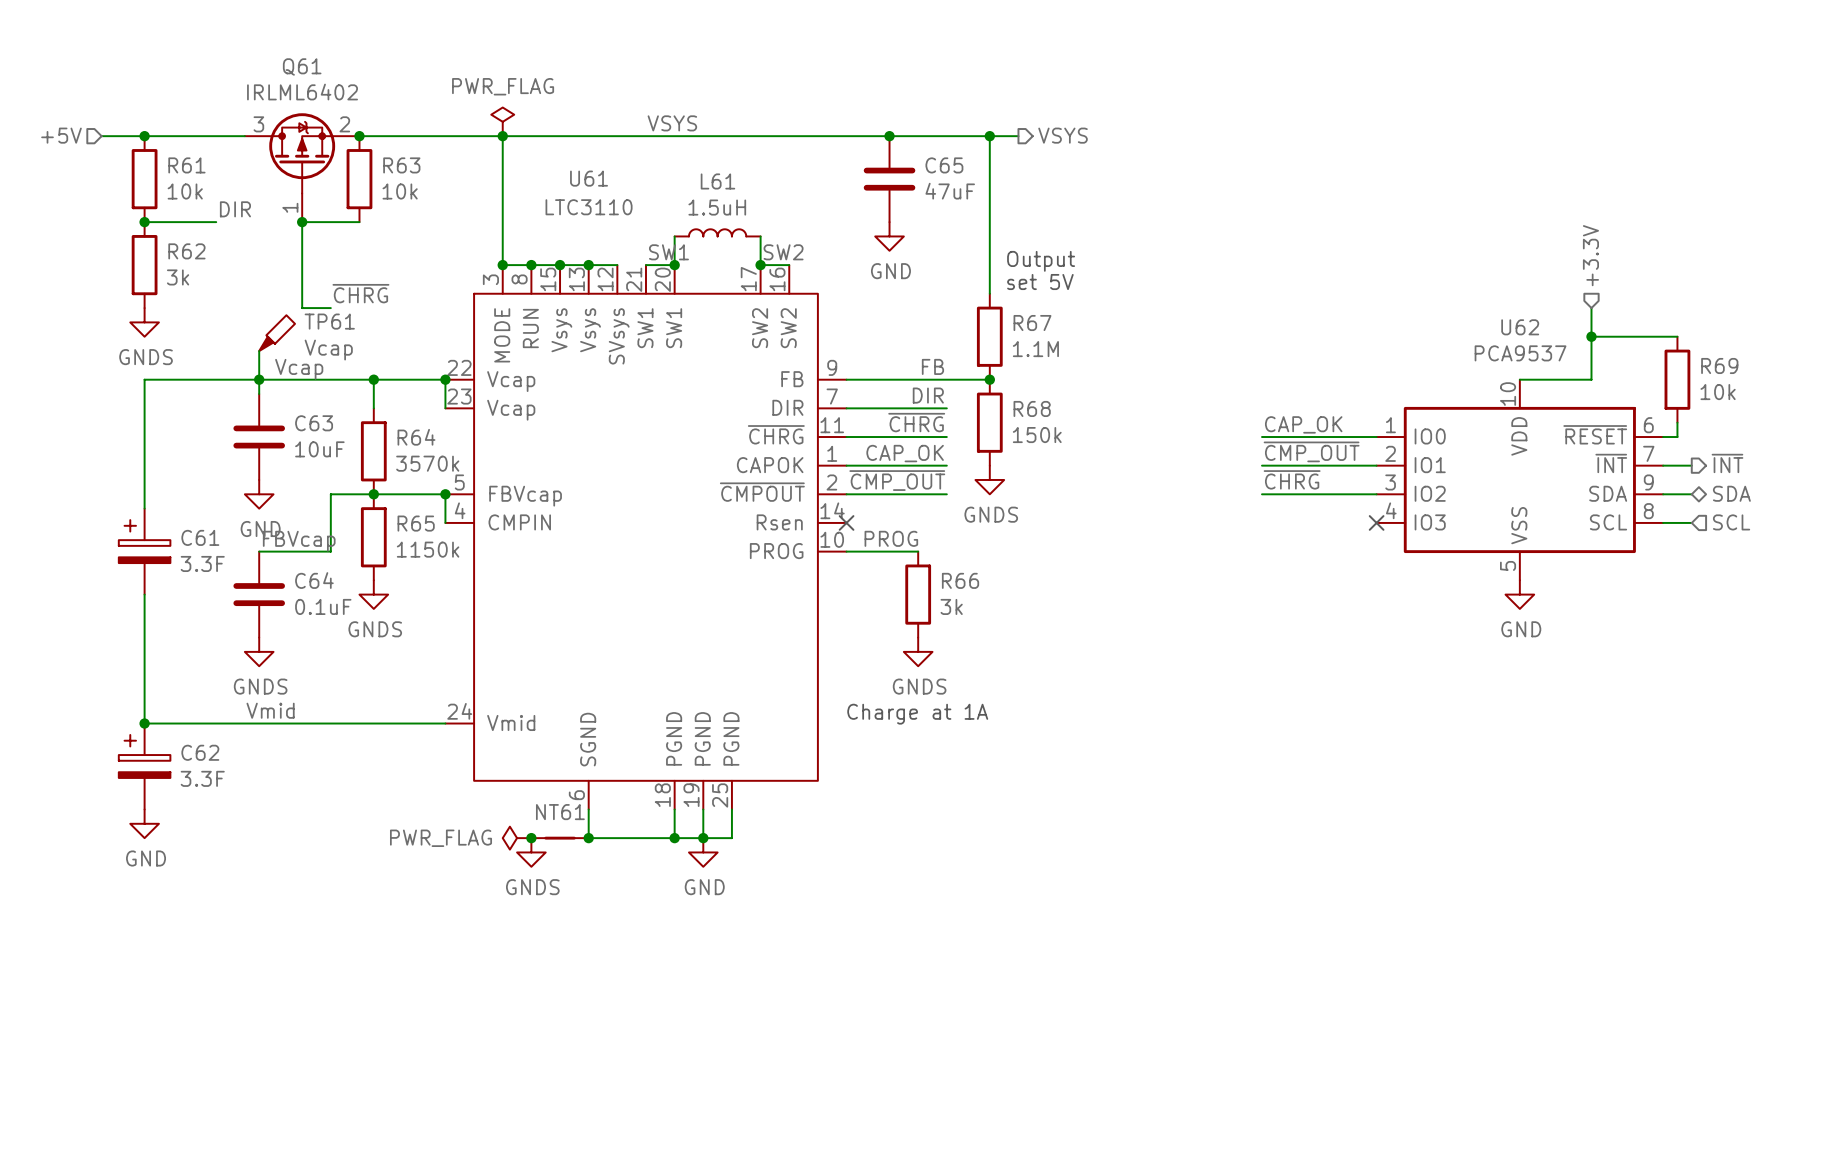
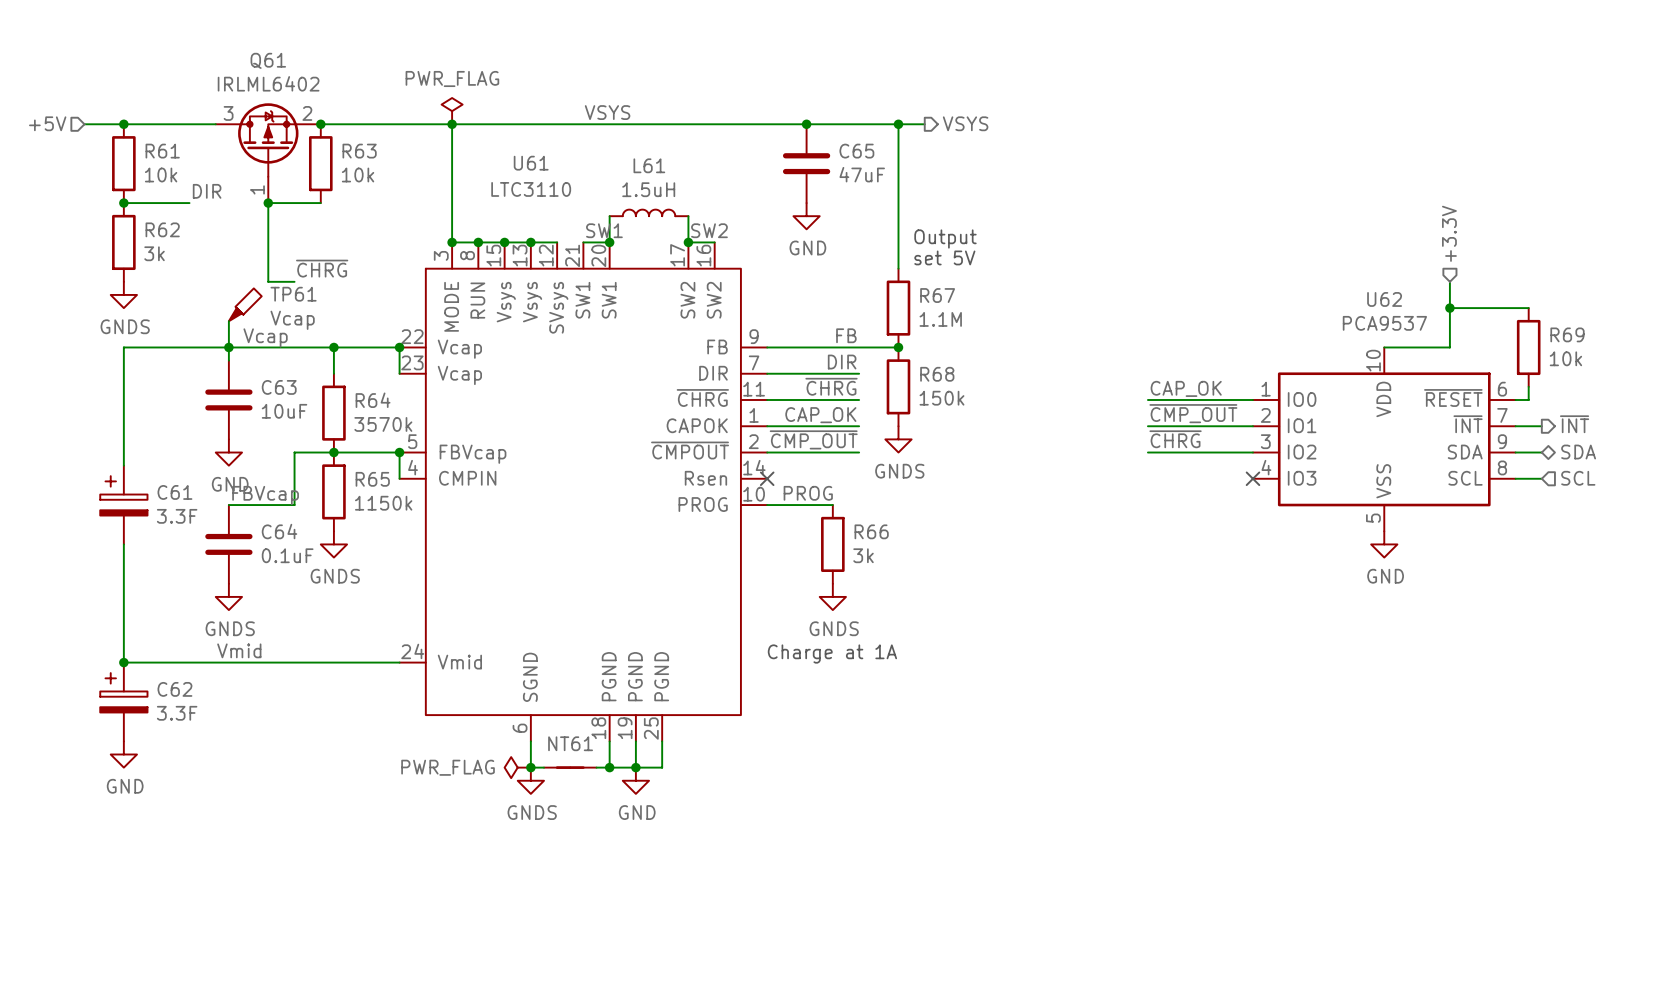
power symbol position: PWR_FLAG (517, 838) -> PWR_FLAG (517, 767)
junction: (531, 838) -> none
NT61 position: (560, 838) -> (570, 767)
power symbol position: GNDS (531, 852) -> GNDS (530, 780)

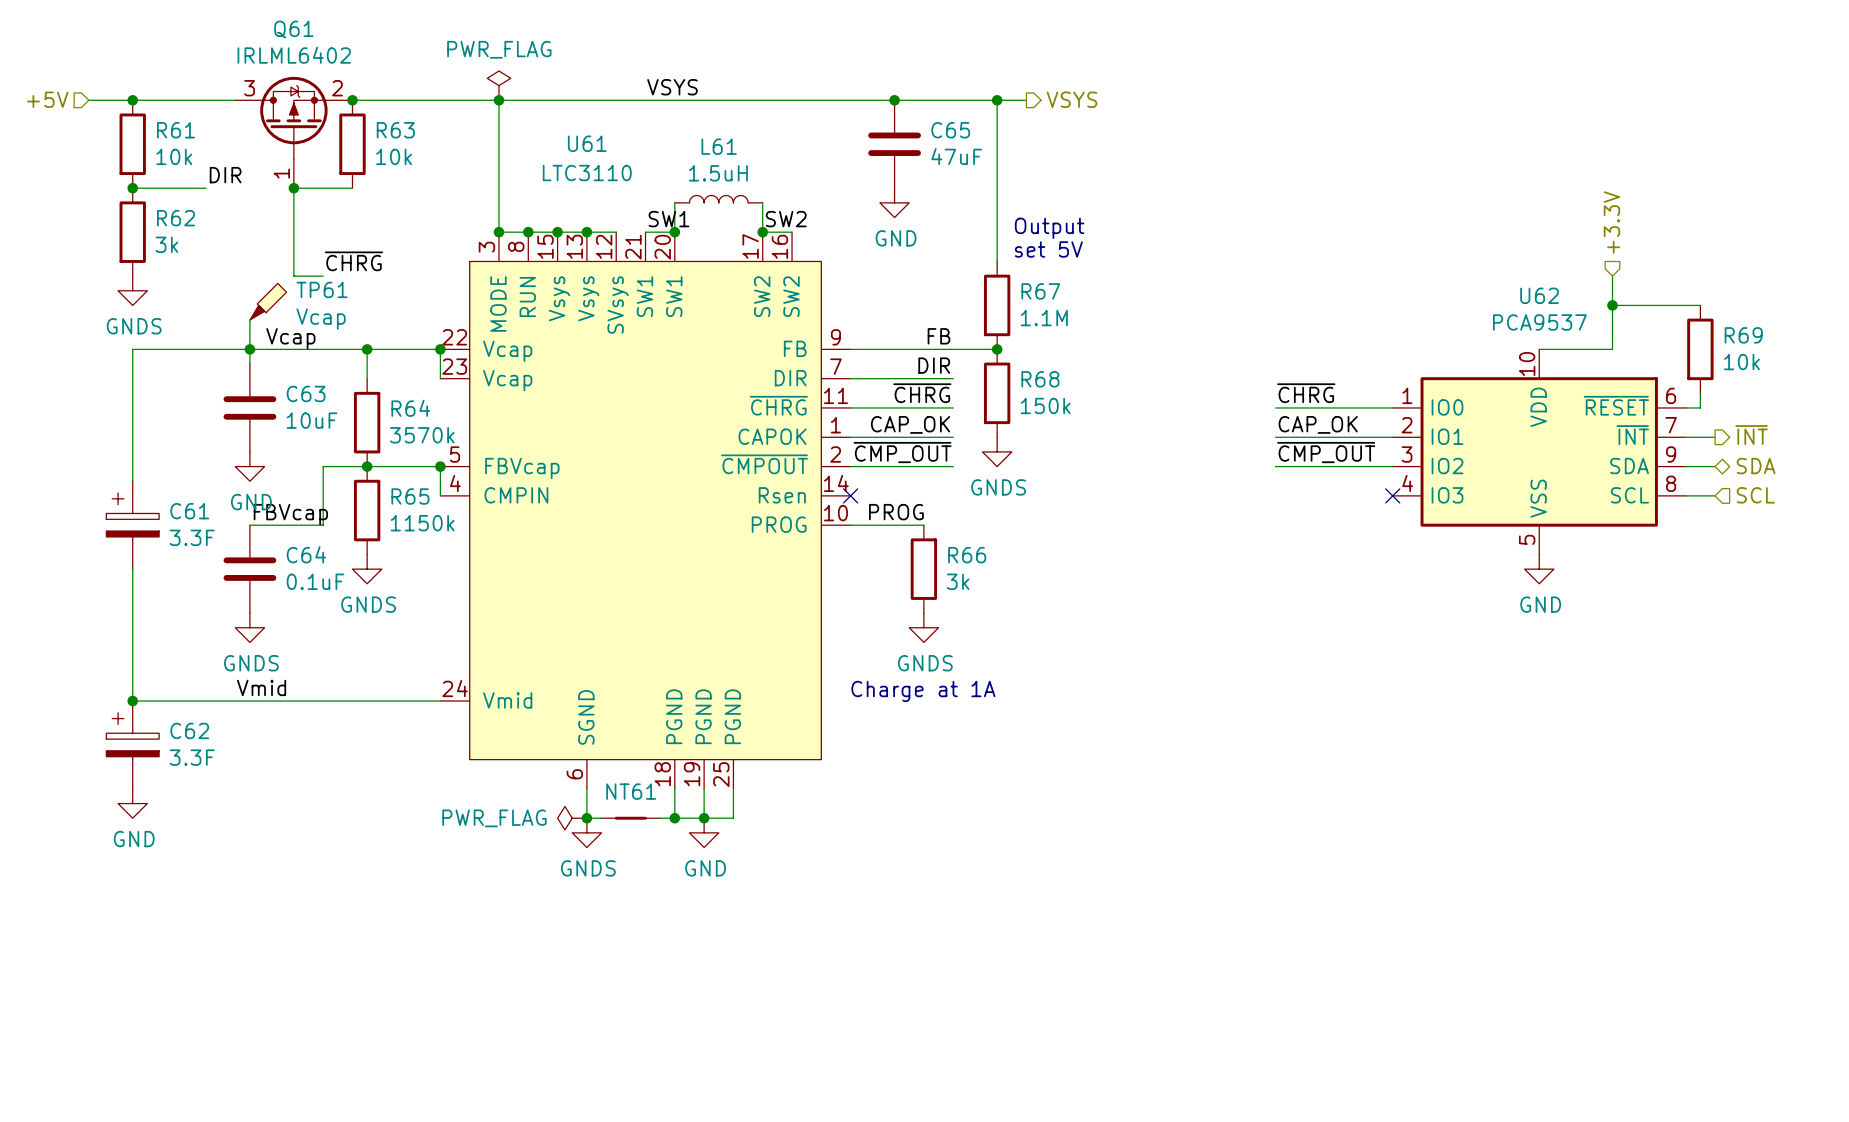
label: CAP_OK (1186, 388) -> ~{CHRG} (1306, 393)
label: ~{CMP_OUT} (1193, 413) -> CAP_OK (1318, 424)
label: ~{CHRG} (1175, 439) -> ~{CMP_OUT} (1326, 452)

